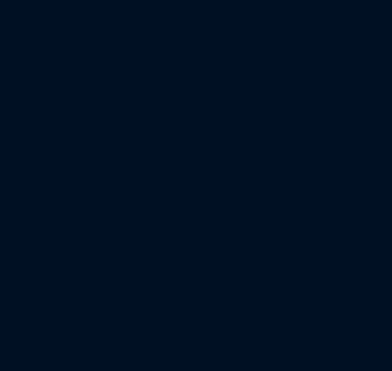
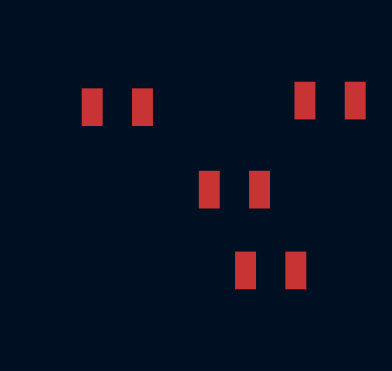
part: none -> (330, 100)
part: none -> (117, 107)
part: none -> (234, 189)
part: none -> (270, 270)

